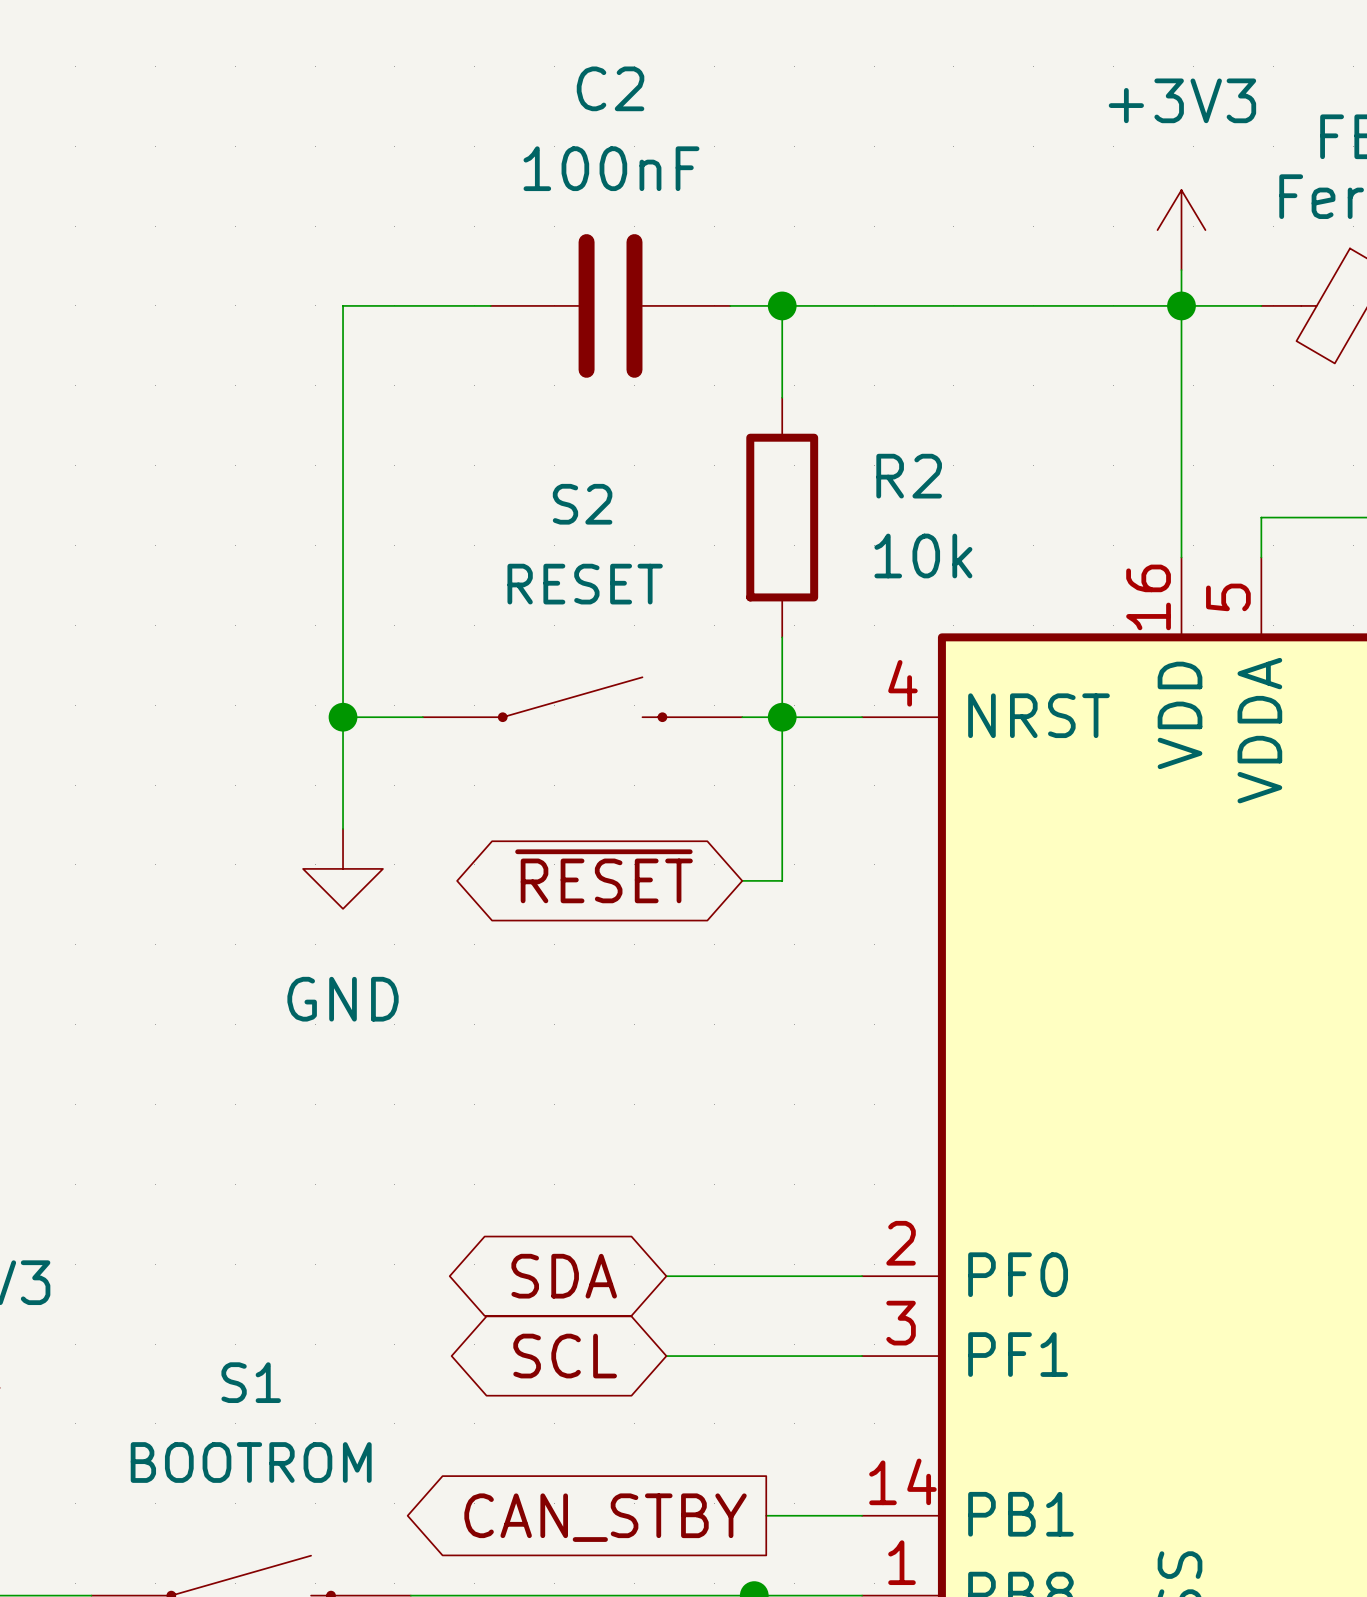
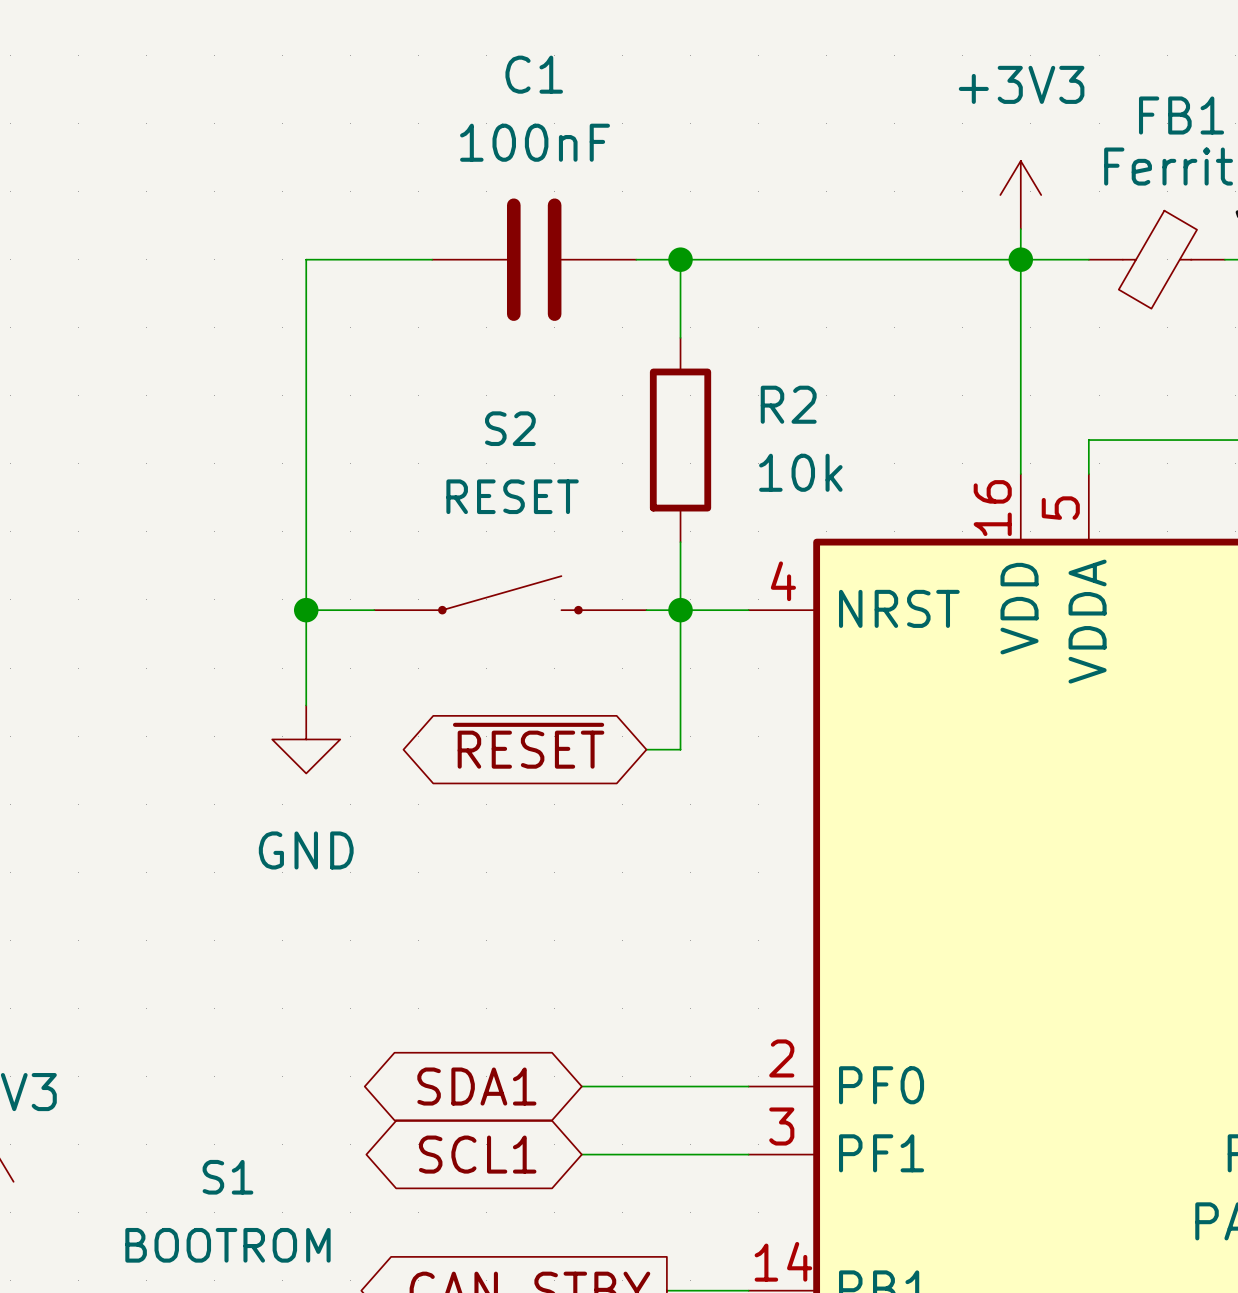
C2 name: C2 (610, 88) -> C1 (534, 74)
global label: SDA (564, 1276) -> SDA1 (476, 1086)
global label: SCL (565, 1356) -> SCL1 (477, 1154)

